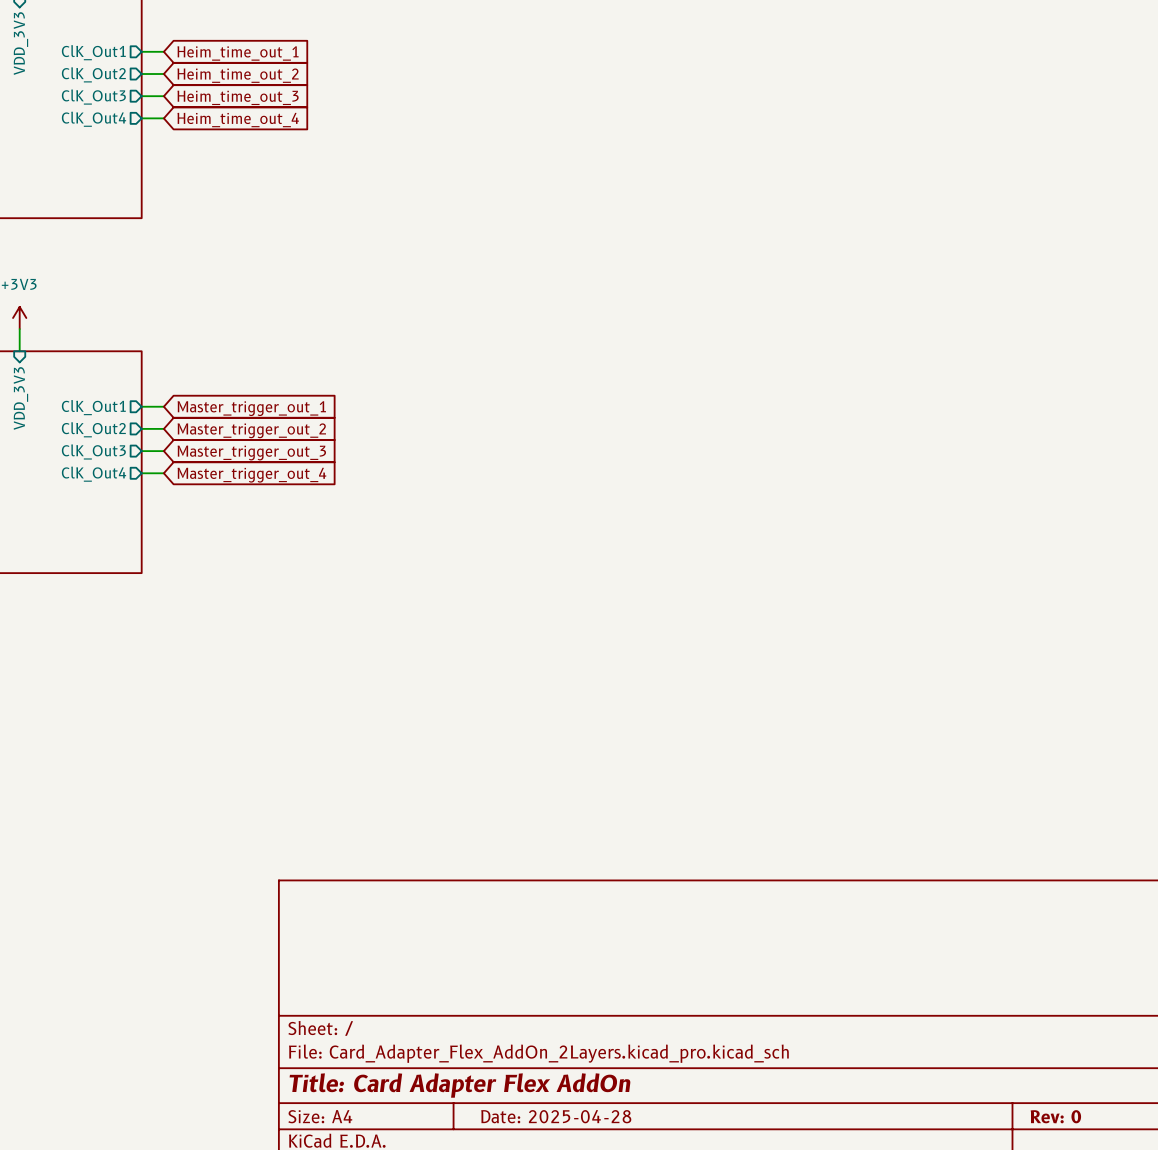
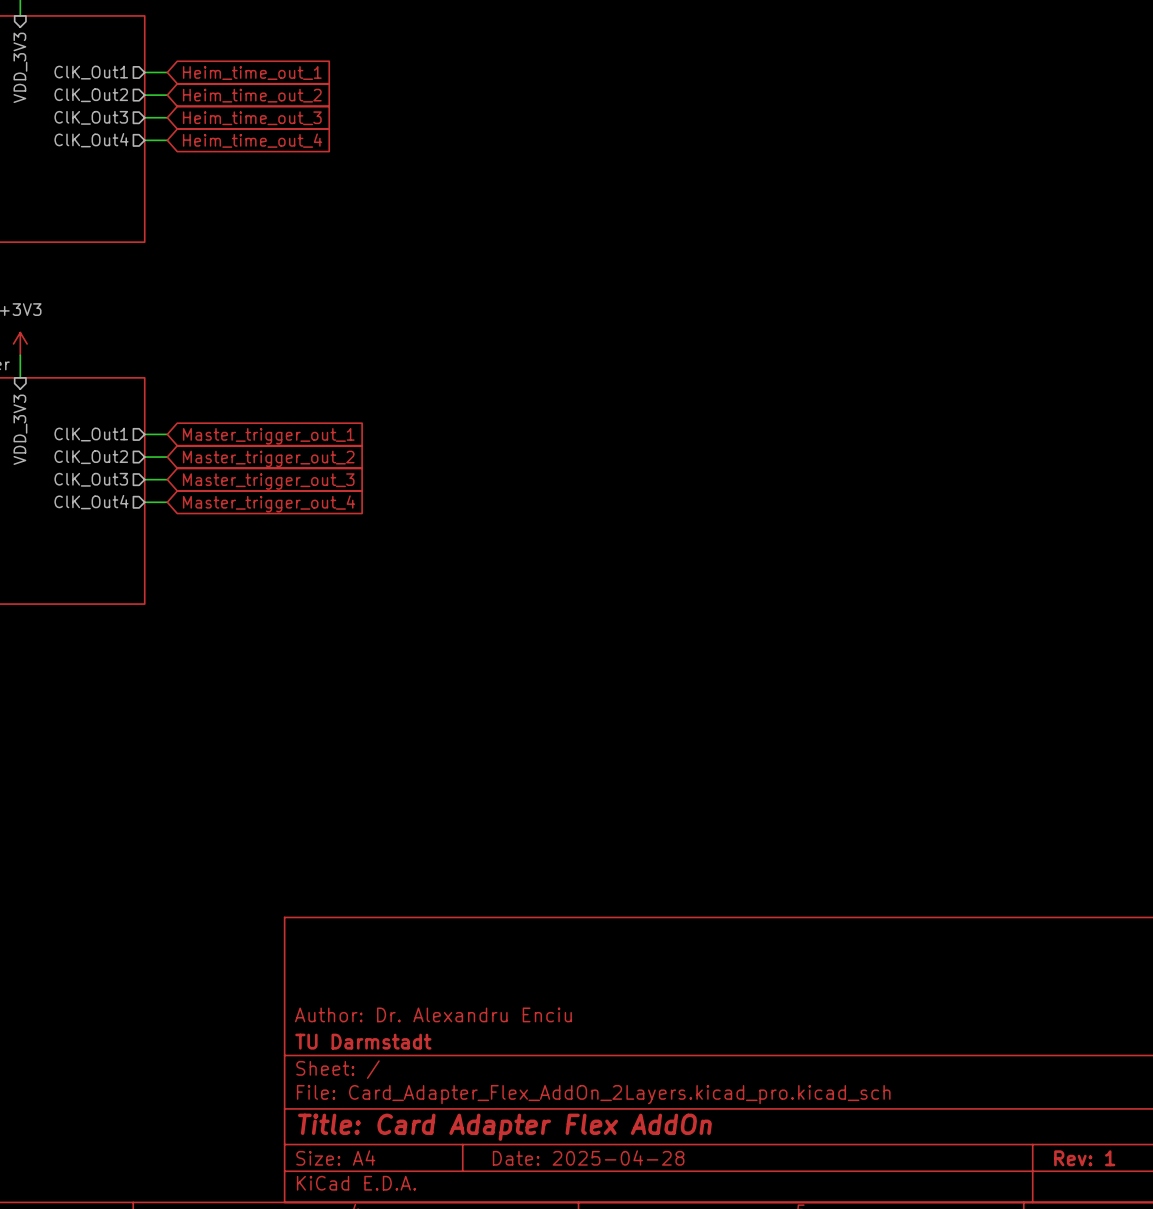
title block: none -> Author: Dr. Alexandru Enciu (433, 1014)
title block: none -> TU Darmstadt (363, 1041)
title block: Rev: 0 (1055, 1116) -> Rev: 1 (1084, 1158)

